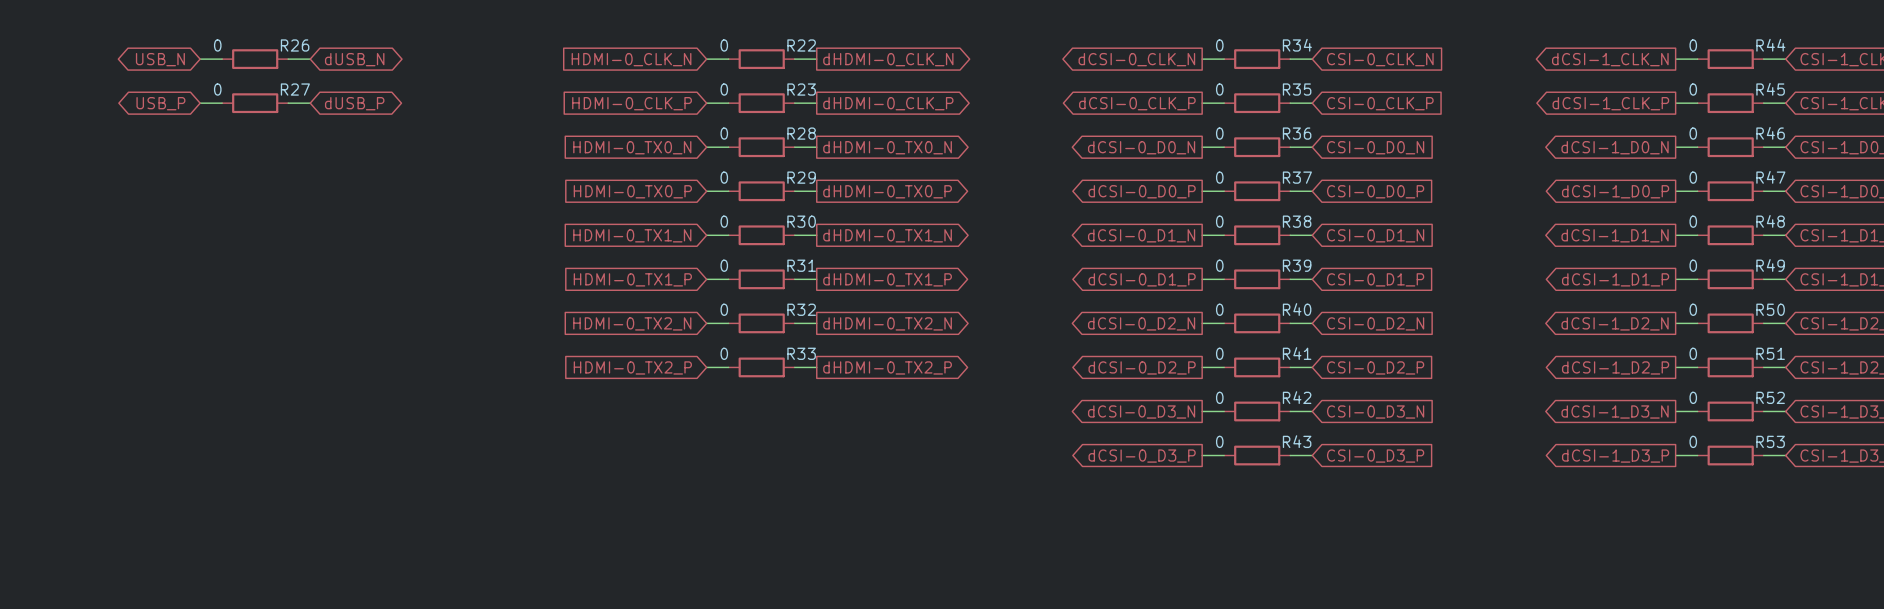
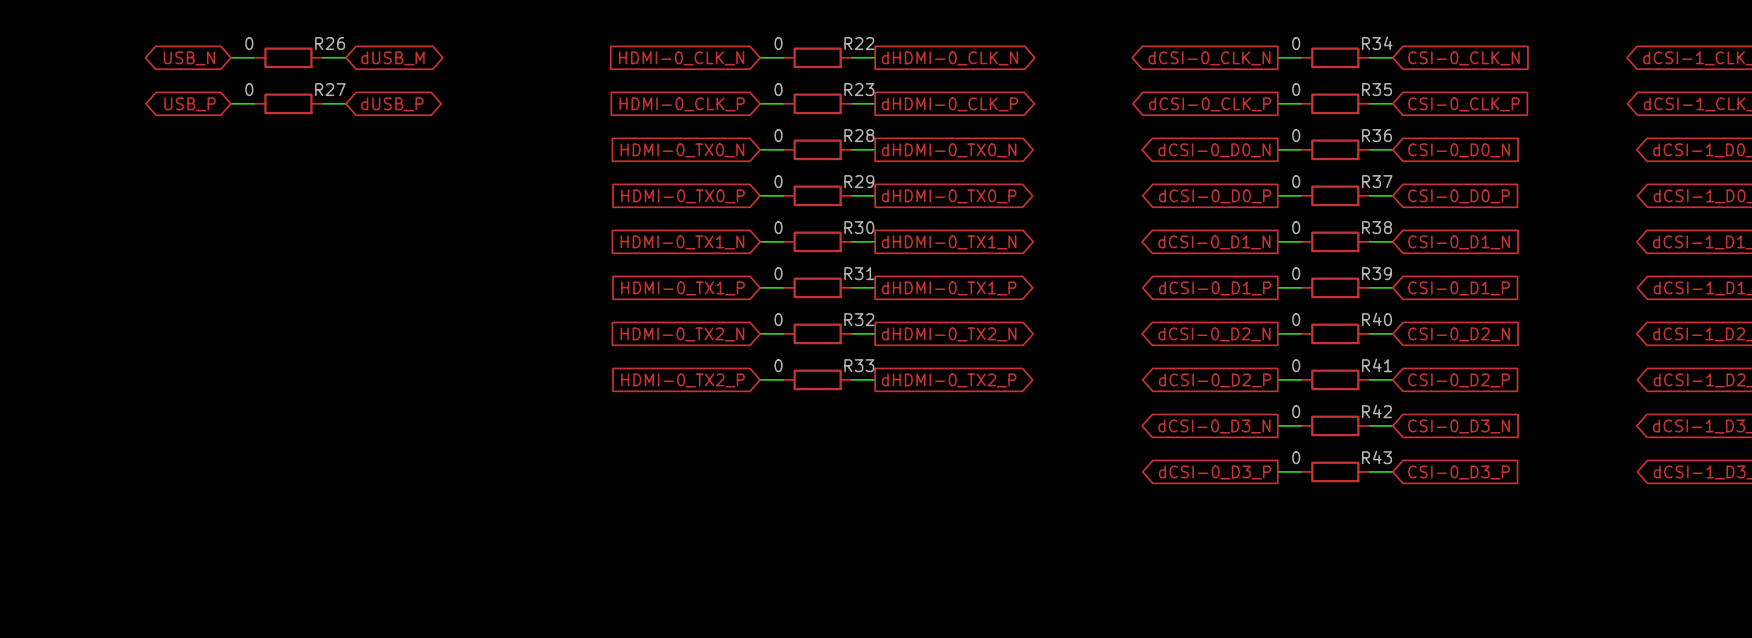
global label: dUSB_N (354, 59) -> dUSB_M (392, 58)

